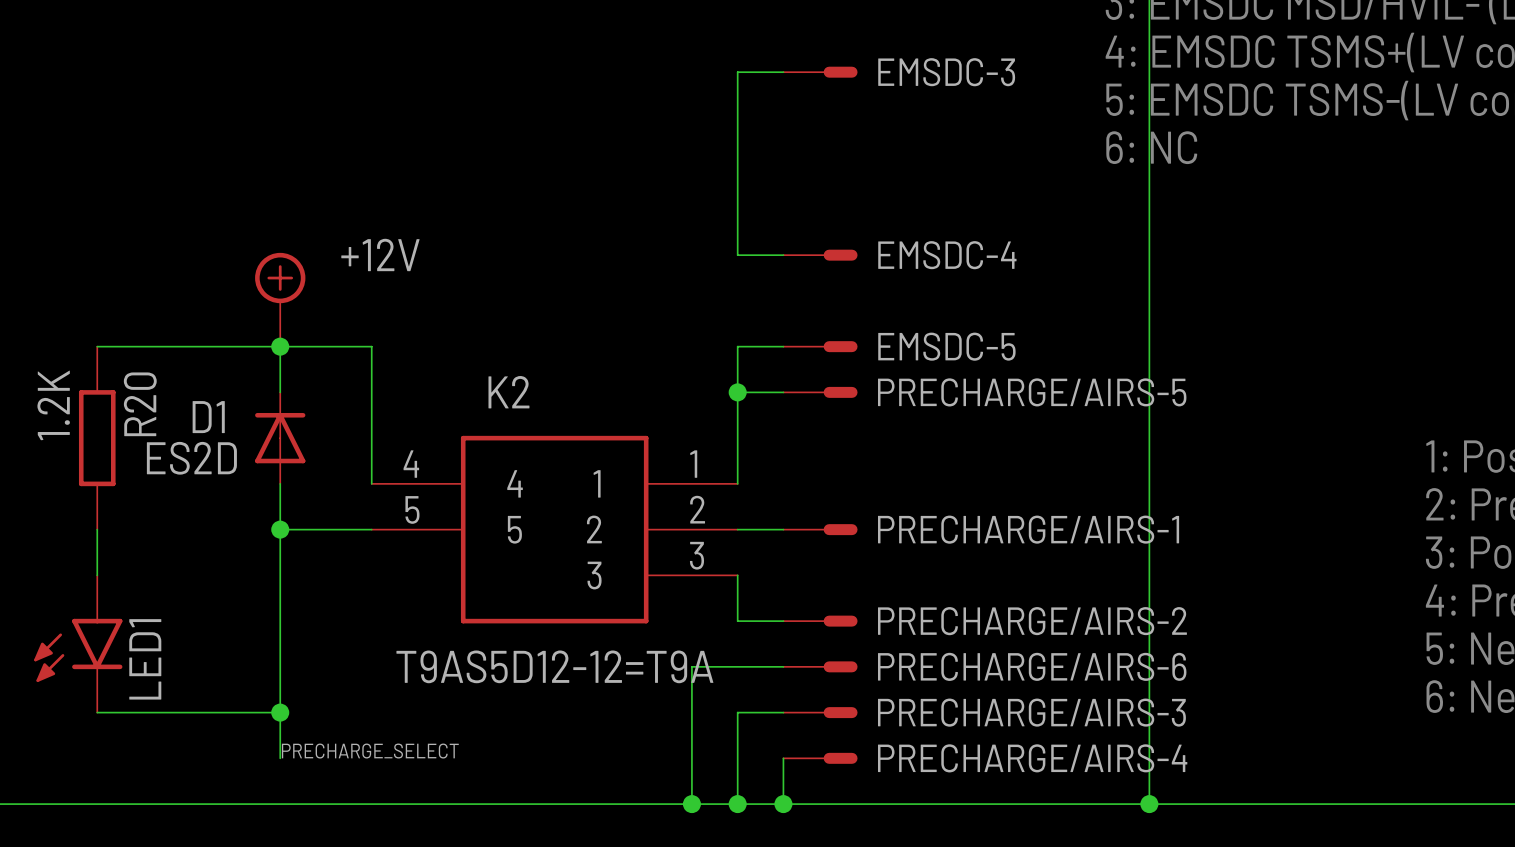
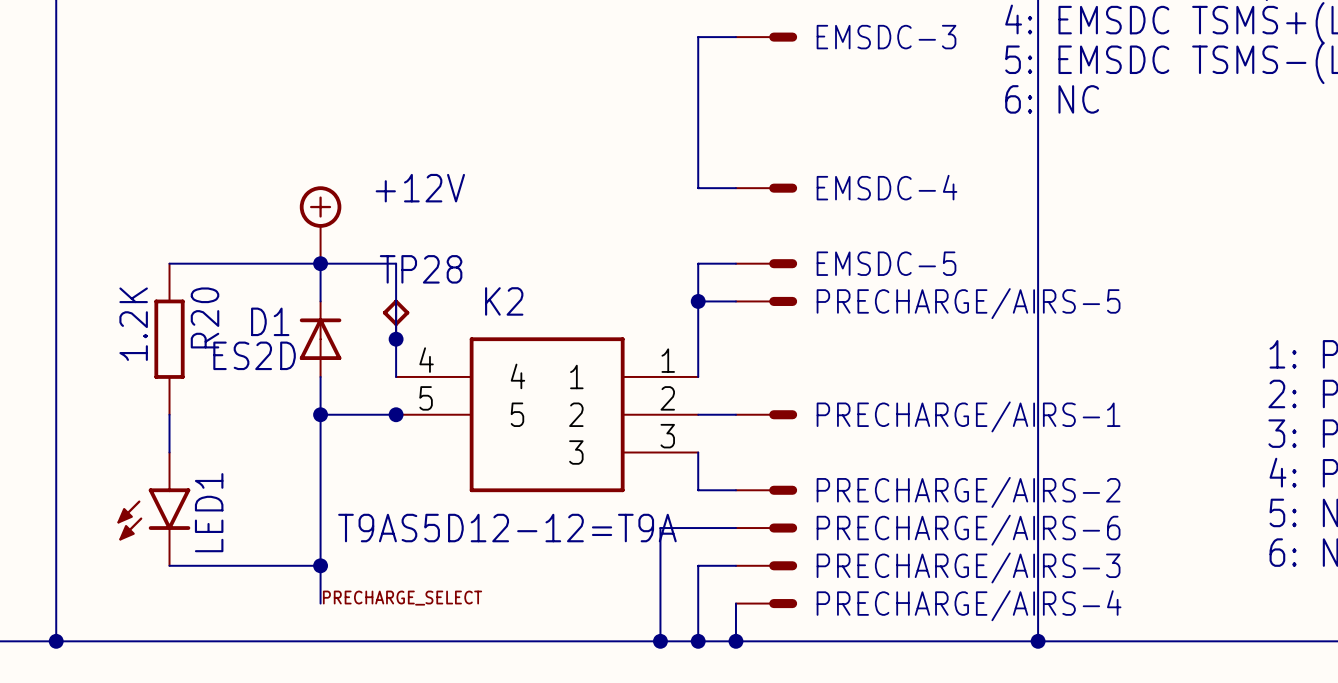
TP28: none -> (396, 319)
junction: none -> (396, 339)
junction: none -> (396, 414)

